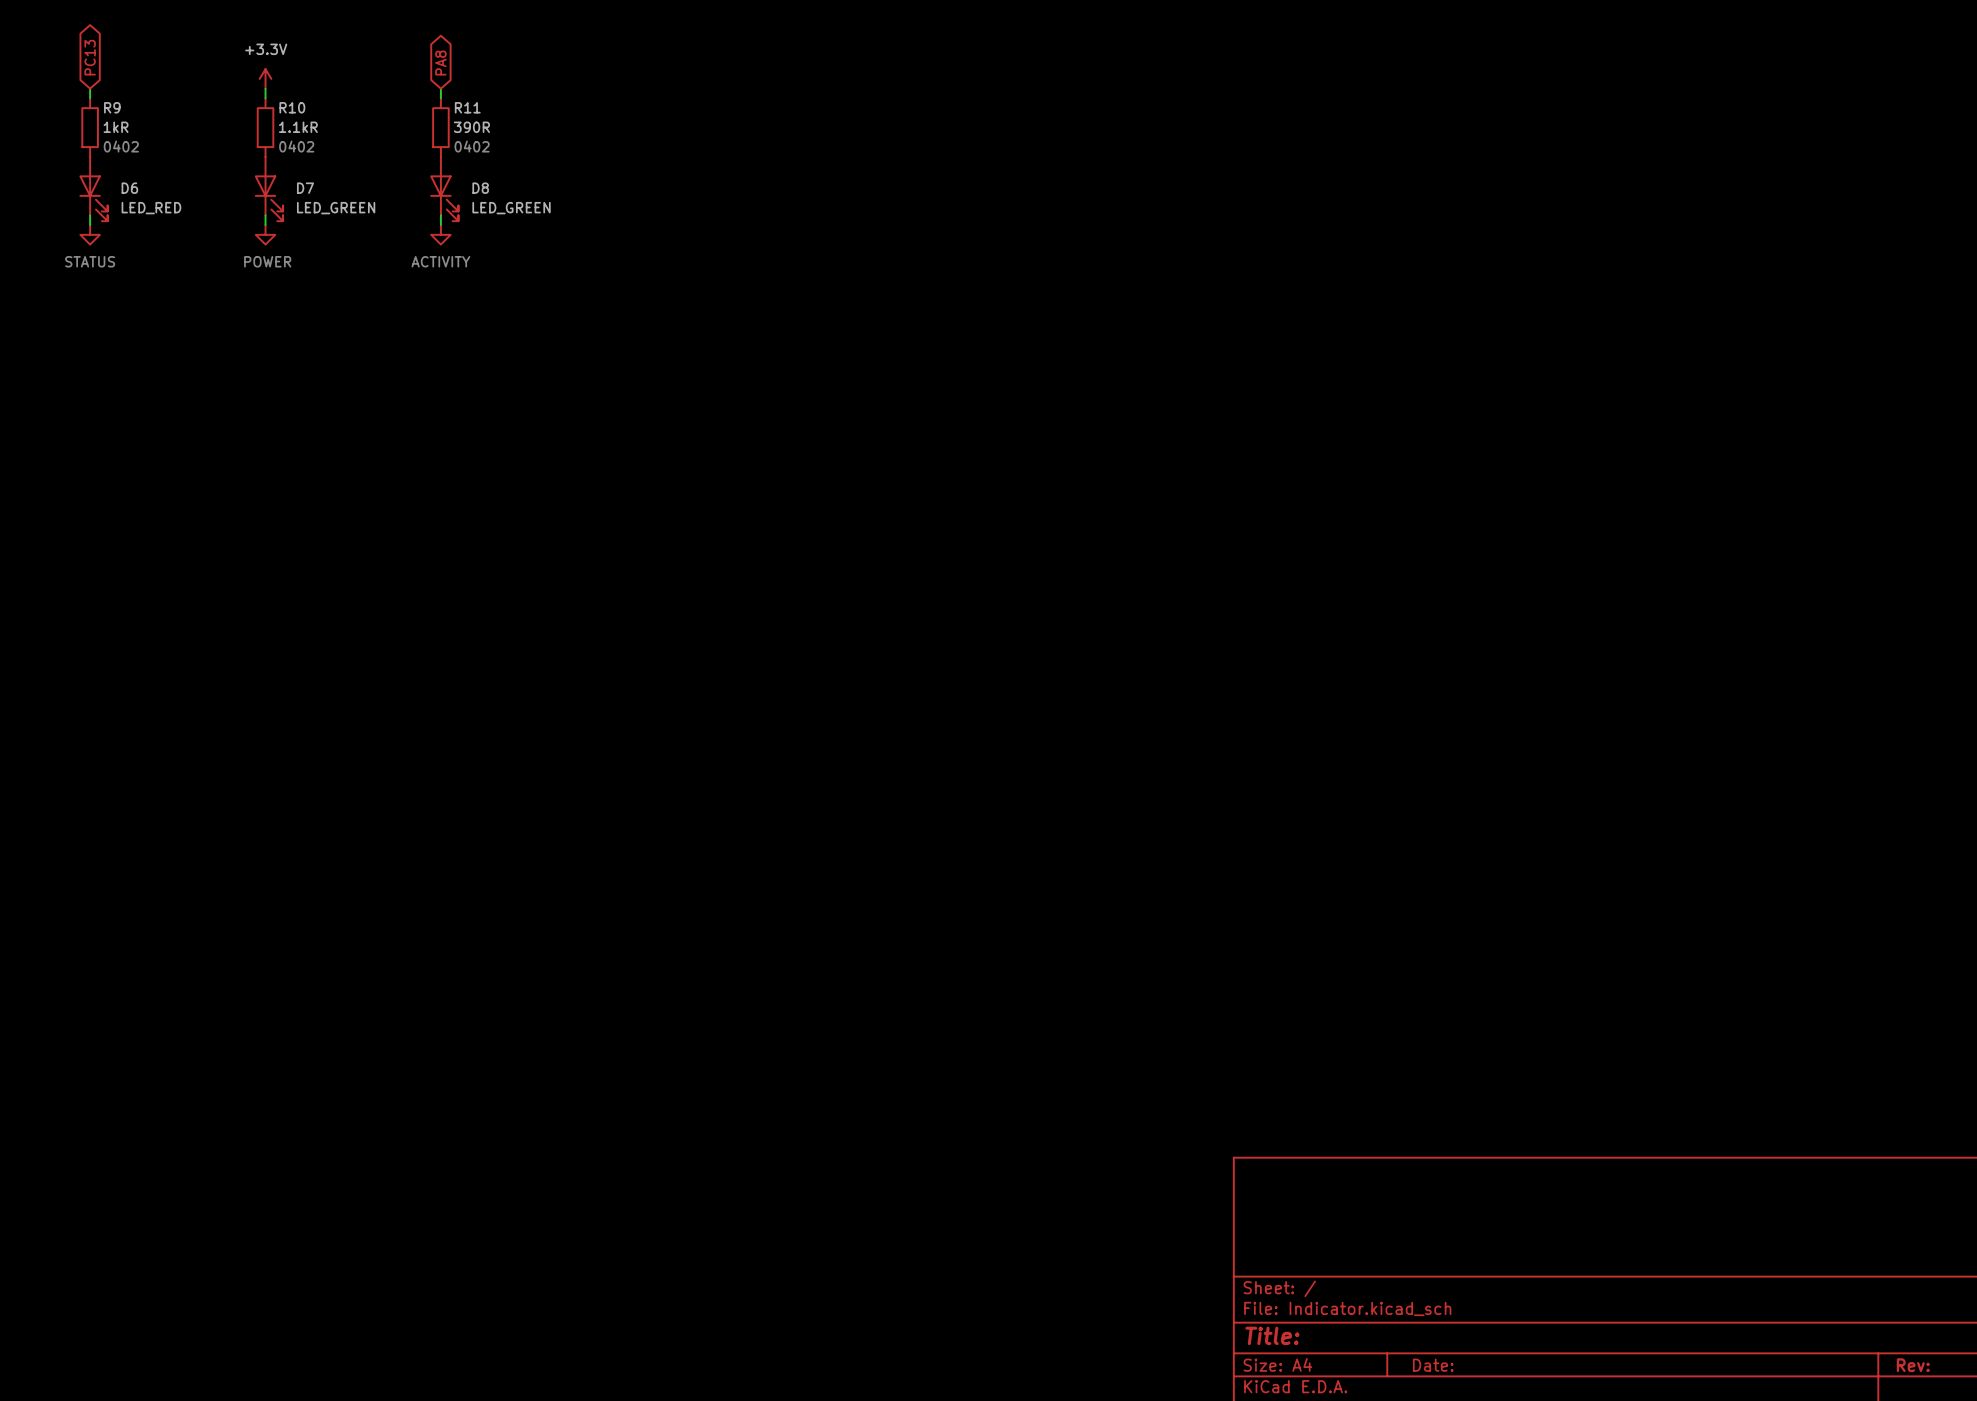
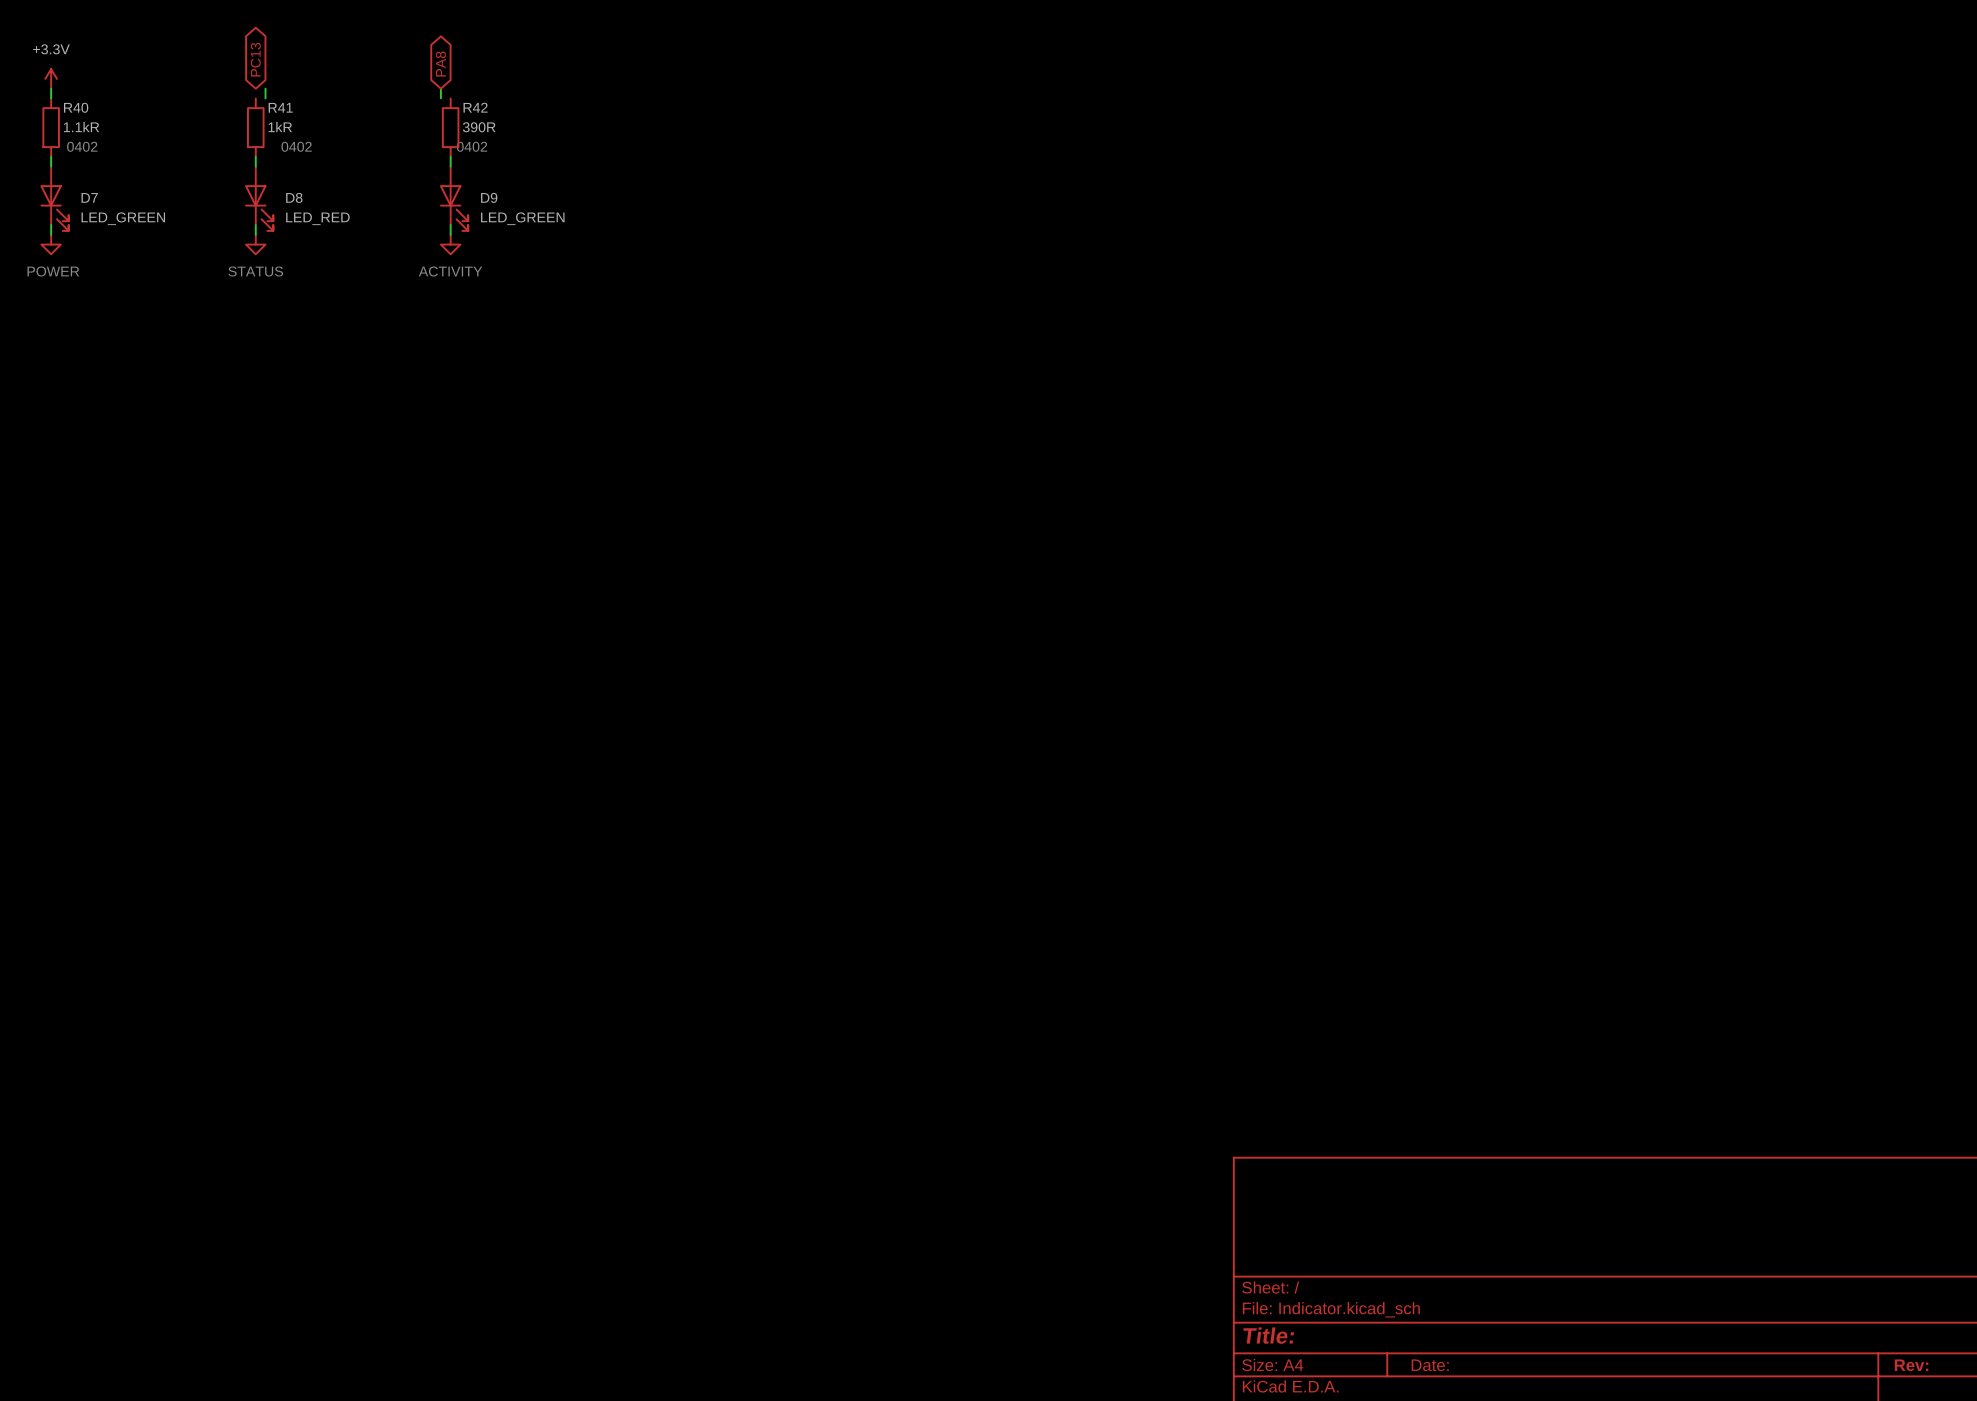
global label position: PC13 (90, 57) -> PC13 (255, 59)
power symbol: none -> +3.3V (51, 78)
power symbol: +3.3V (265, 78) -> none
wire: (90, 88) (90, 98) -> (51, 88) (51, 98)
R40: none -> 1.1kR (51, 127)
R9: 1kR (90, 127) -> none
R41: none -> 1kR (255, 127)
R10: 1.1kR (265, 127) -> none
R11: 390R (440, 127) -> none
R42: none -> 390R (450, 127)
text position: 0402 (121, 146) -> 0402 (82, 146)
wire: none -> (51, 156) (51, 166)
wire: none -> (255, 156) (255, 166)
wire: none -> (450, 156) (450, 166)
D6: LED_RED (93, 189) -> none
D7 position: (268, 189) -> (54, 198)
D8 position: (444, 189) -> (259, 198)
D9: none -> LED_GREEN (454, 198)
D8 value: LED_GREEN (511, 208) -> LED_RED (317, 218)
wire: (90, 215) (90, 225) -> (51, 225) (51, 234)
wire: (265, 215) (265, 225) -> (255, 225) (255, 234)
wire: (440, 215) (440, 225) -> (450, 225) (450, 234)
power symbol position: (90, 234) -> (51, 244)
power symbol position: (265, 234) -> (255, 244)
power symbol position: (440, 234) -> (450, 244)
text position: STATUS (90, 261) -> STATUS (255, 271)
text: POWER (267, 261) -> none
text position: ACTIVITY (440, 261) -> ACTIVITY (450, 271)
text: none -> POWER (53, 271)

